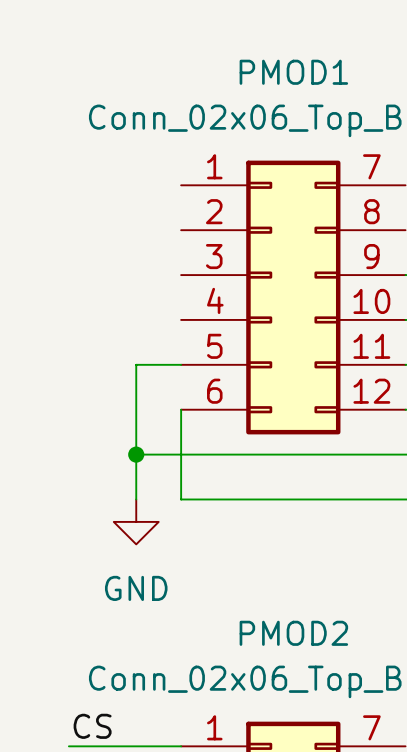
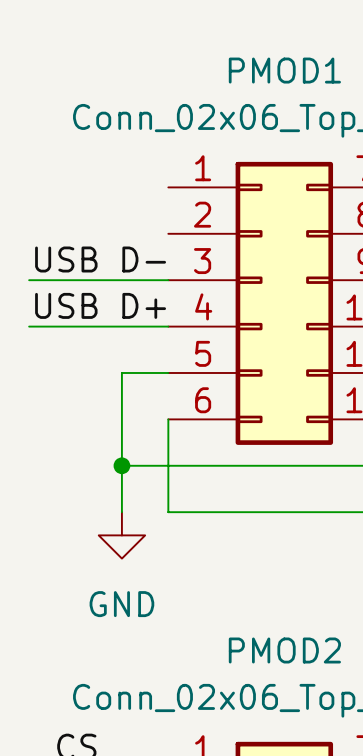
label: none -> USB D- (100, 259)
wire: none -> (29, 280) (168, 280)
label: none -> USB D+ (100, 305)
wire: none -> (29, 326) (168, 326)

